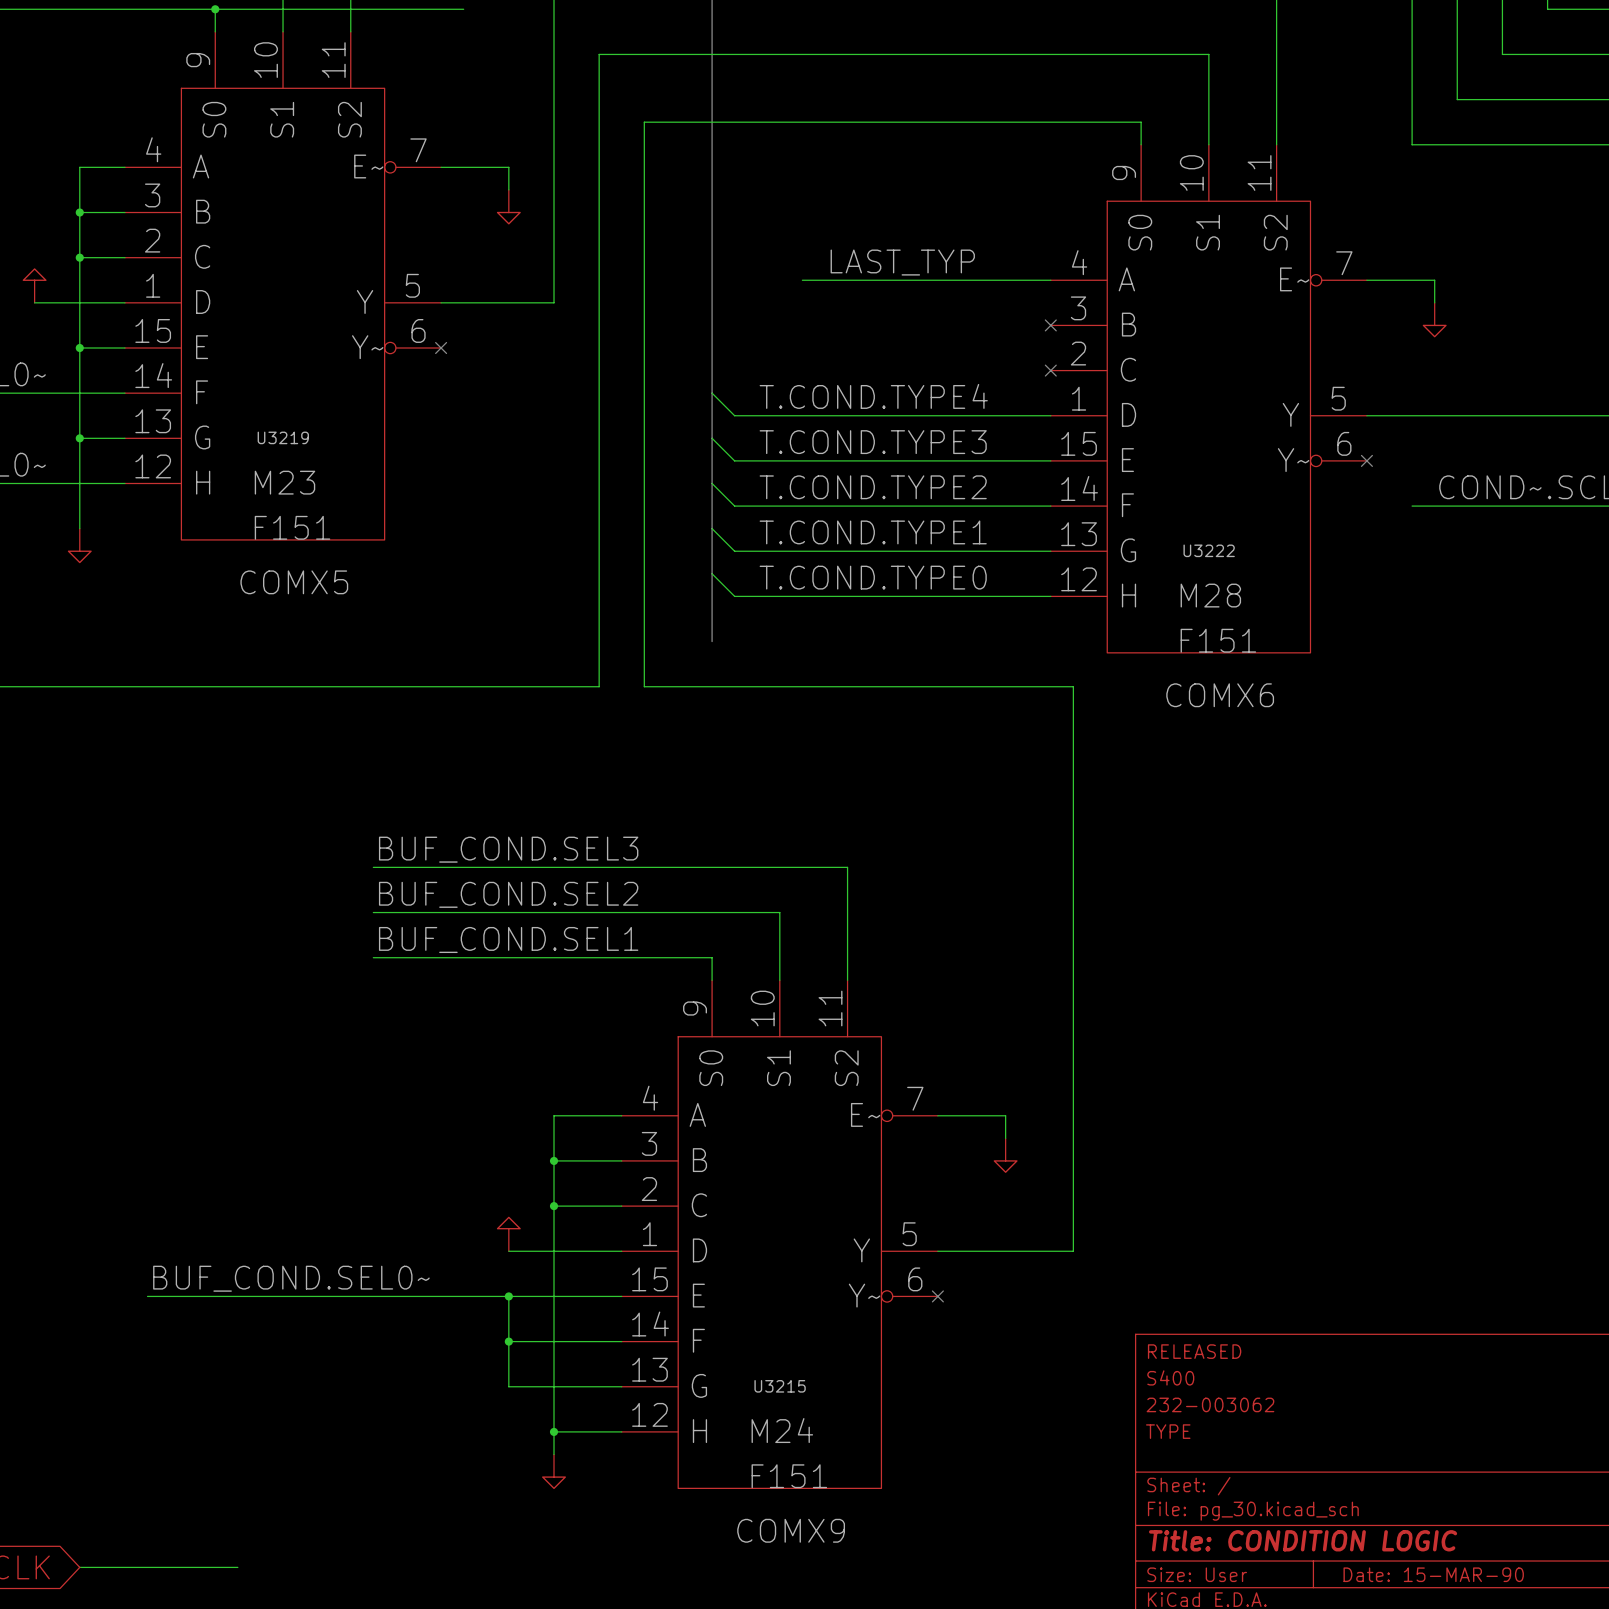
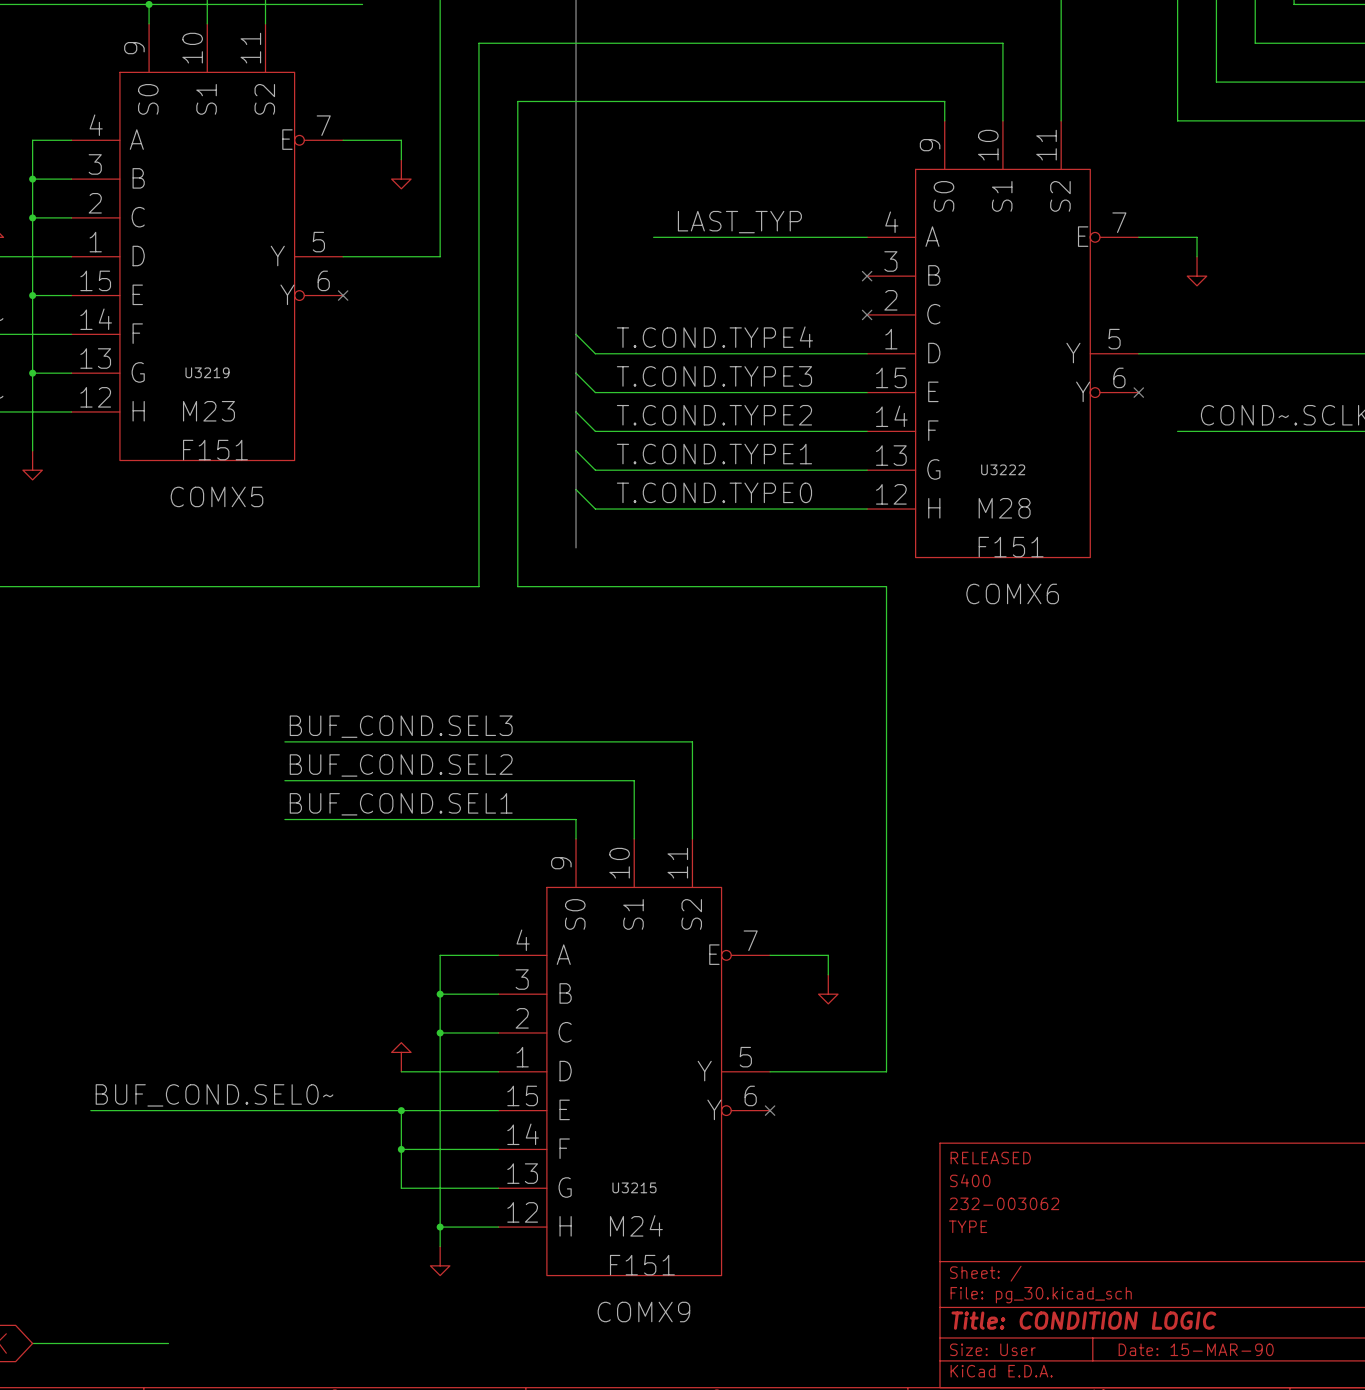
U3219 pin name: E~ (368, 166) -> E (287, 139)
U3222 pin name: E~ (1294, 279) -> E (1083, 236)
U3219 pin name: Y~ (367, 347) -> Y (287, 294)
U3222 pin name: Y~ (1293, 460) -> Y (1083, 391)
U3215 pin name: E~ (865, 1114) -> E (714, 954)
U3215 pin name: Y~ (864, 1295) -> Y (714, 1109)

